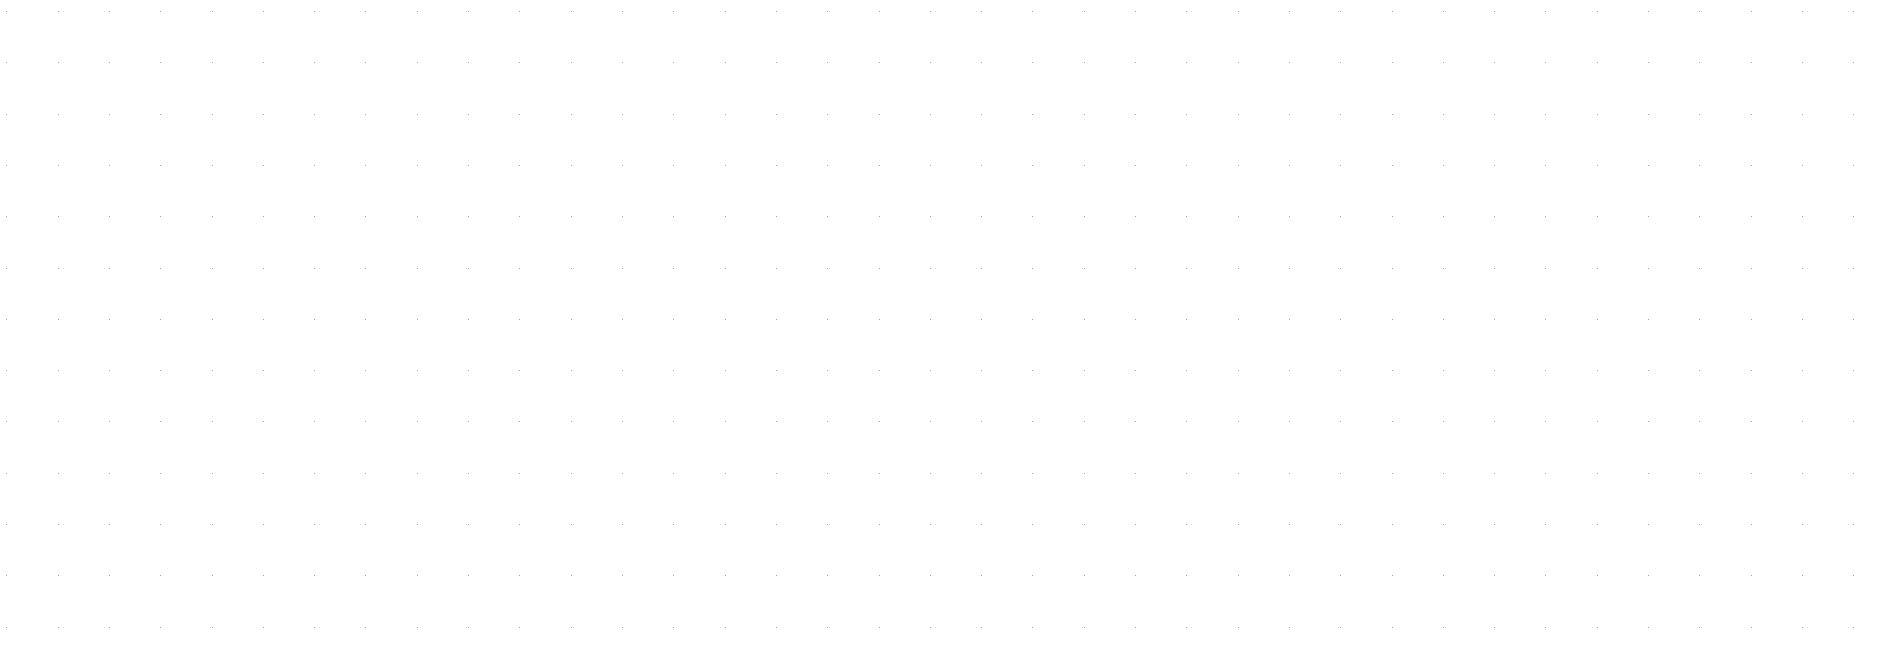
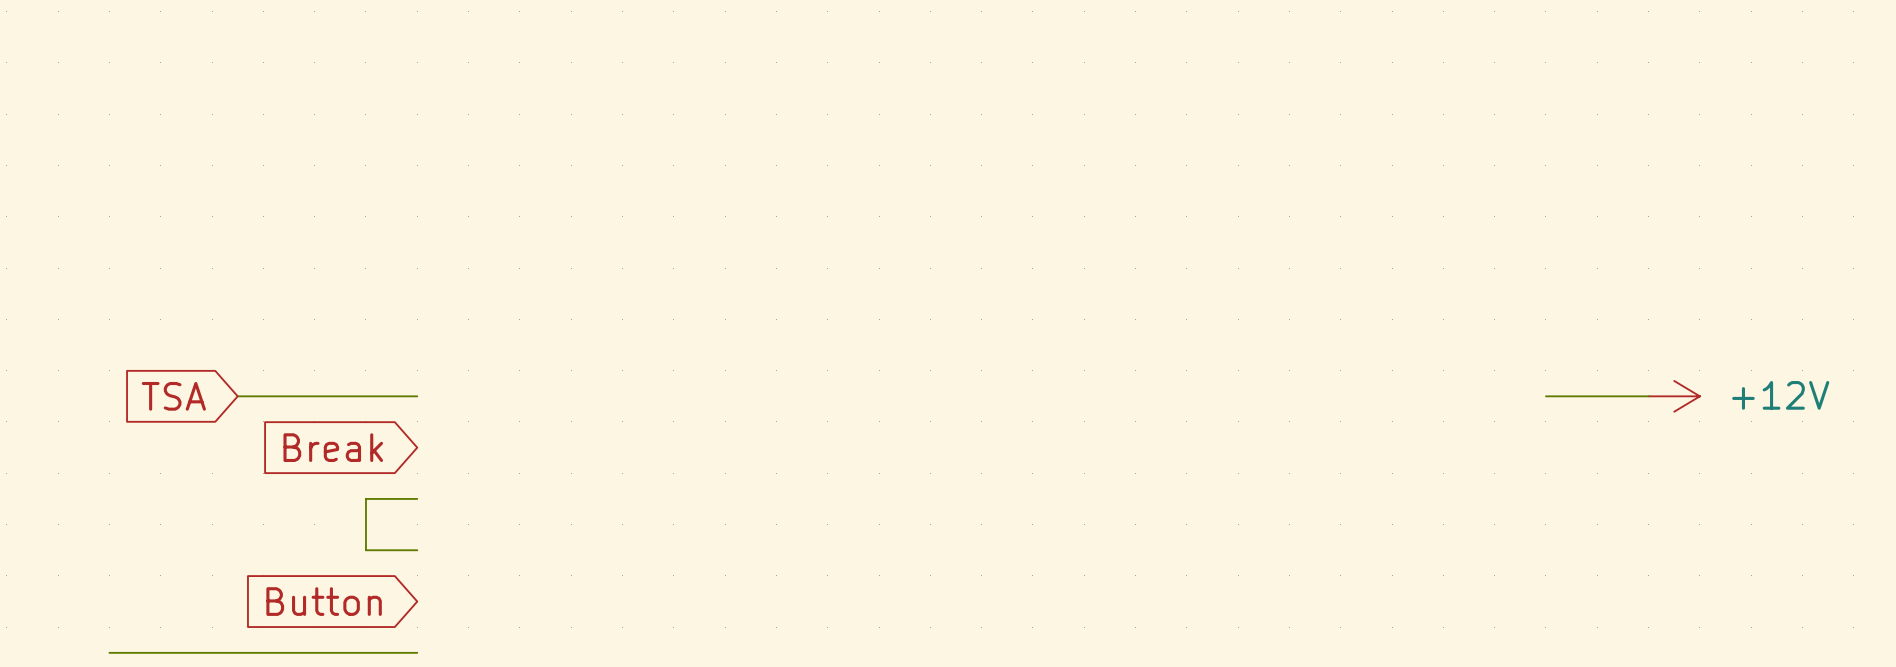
global label: none -> TSA (173, 396)
wire: none -> (237, 396) (417, 396)
wire: none -> (1545, 396) (1648, 396)
power symbol: none -> +12V (1674, 396)
global label: none -> Break (333, 447)
wire: none -> (417, 498) (365, 498) (365, 550) (417, 550)
global label: none -> Button (324, 601)
wire: none -> (109, 652) (417, 652)

